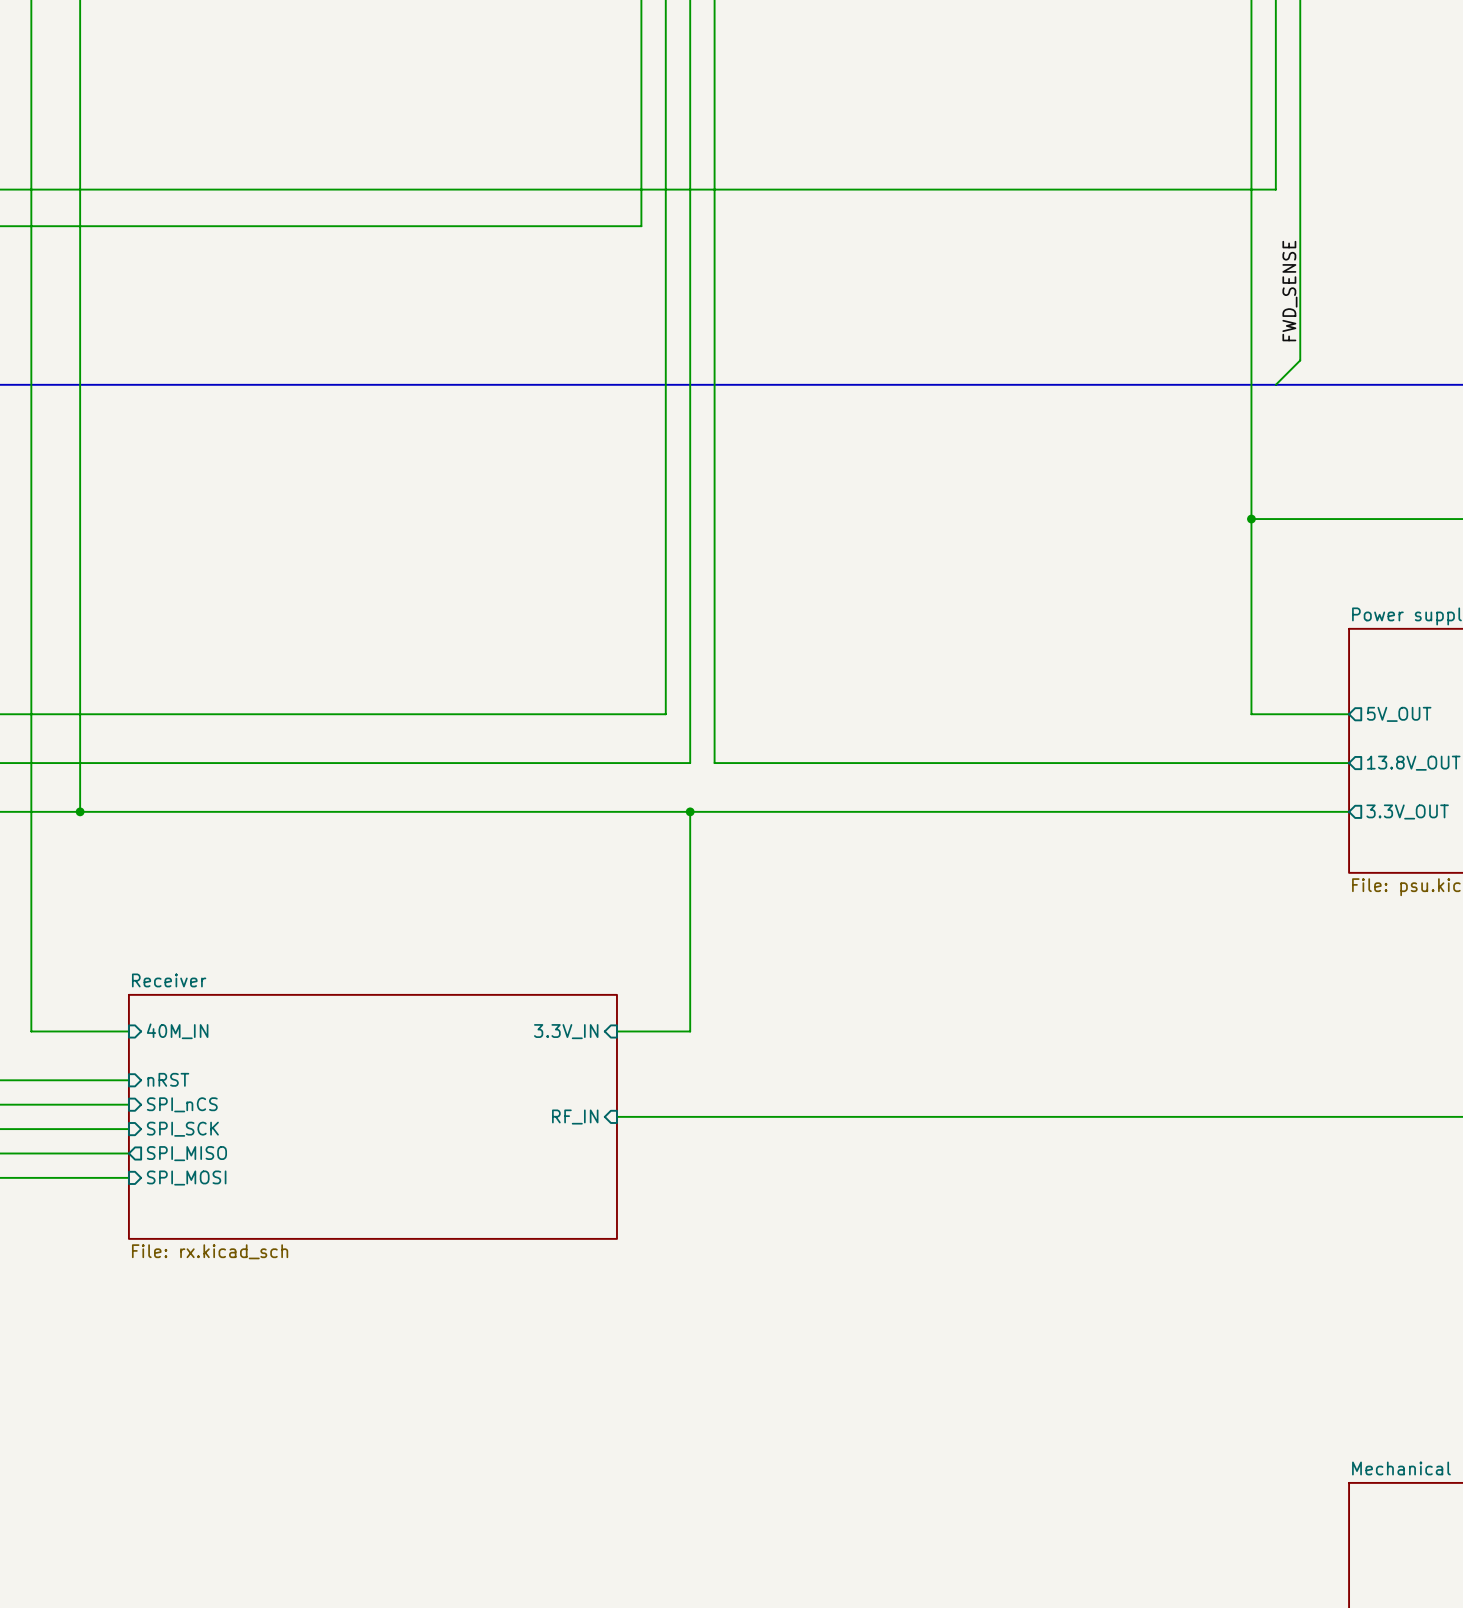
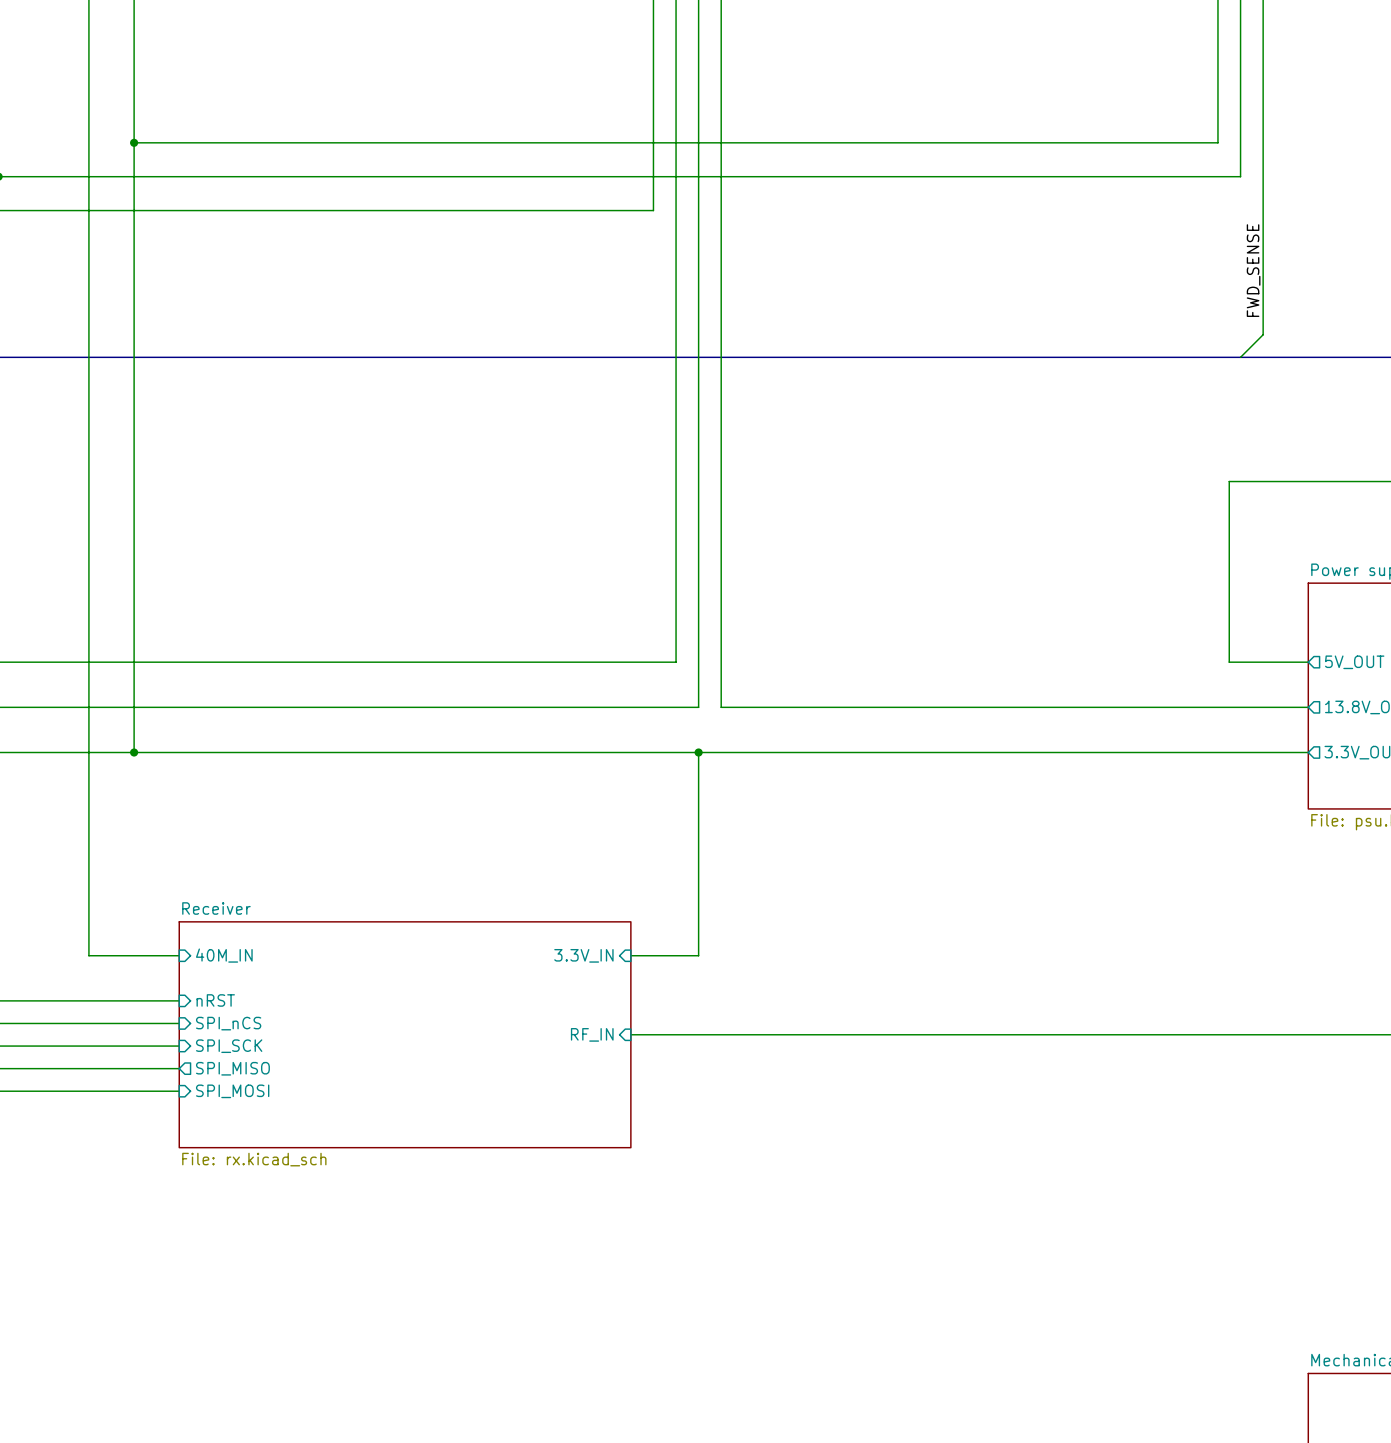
junction: none -> (134, 142)
wire: (1251, 152) (1251, 714) (1263, 714) -> (1217, 142) (134, 142)
wire: (1251, 519) (1263, 519) -> (1229, 662) (1229, 481)
junction: (1251, 519) -> none

